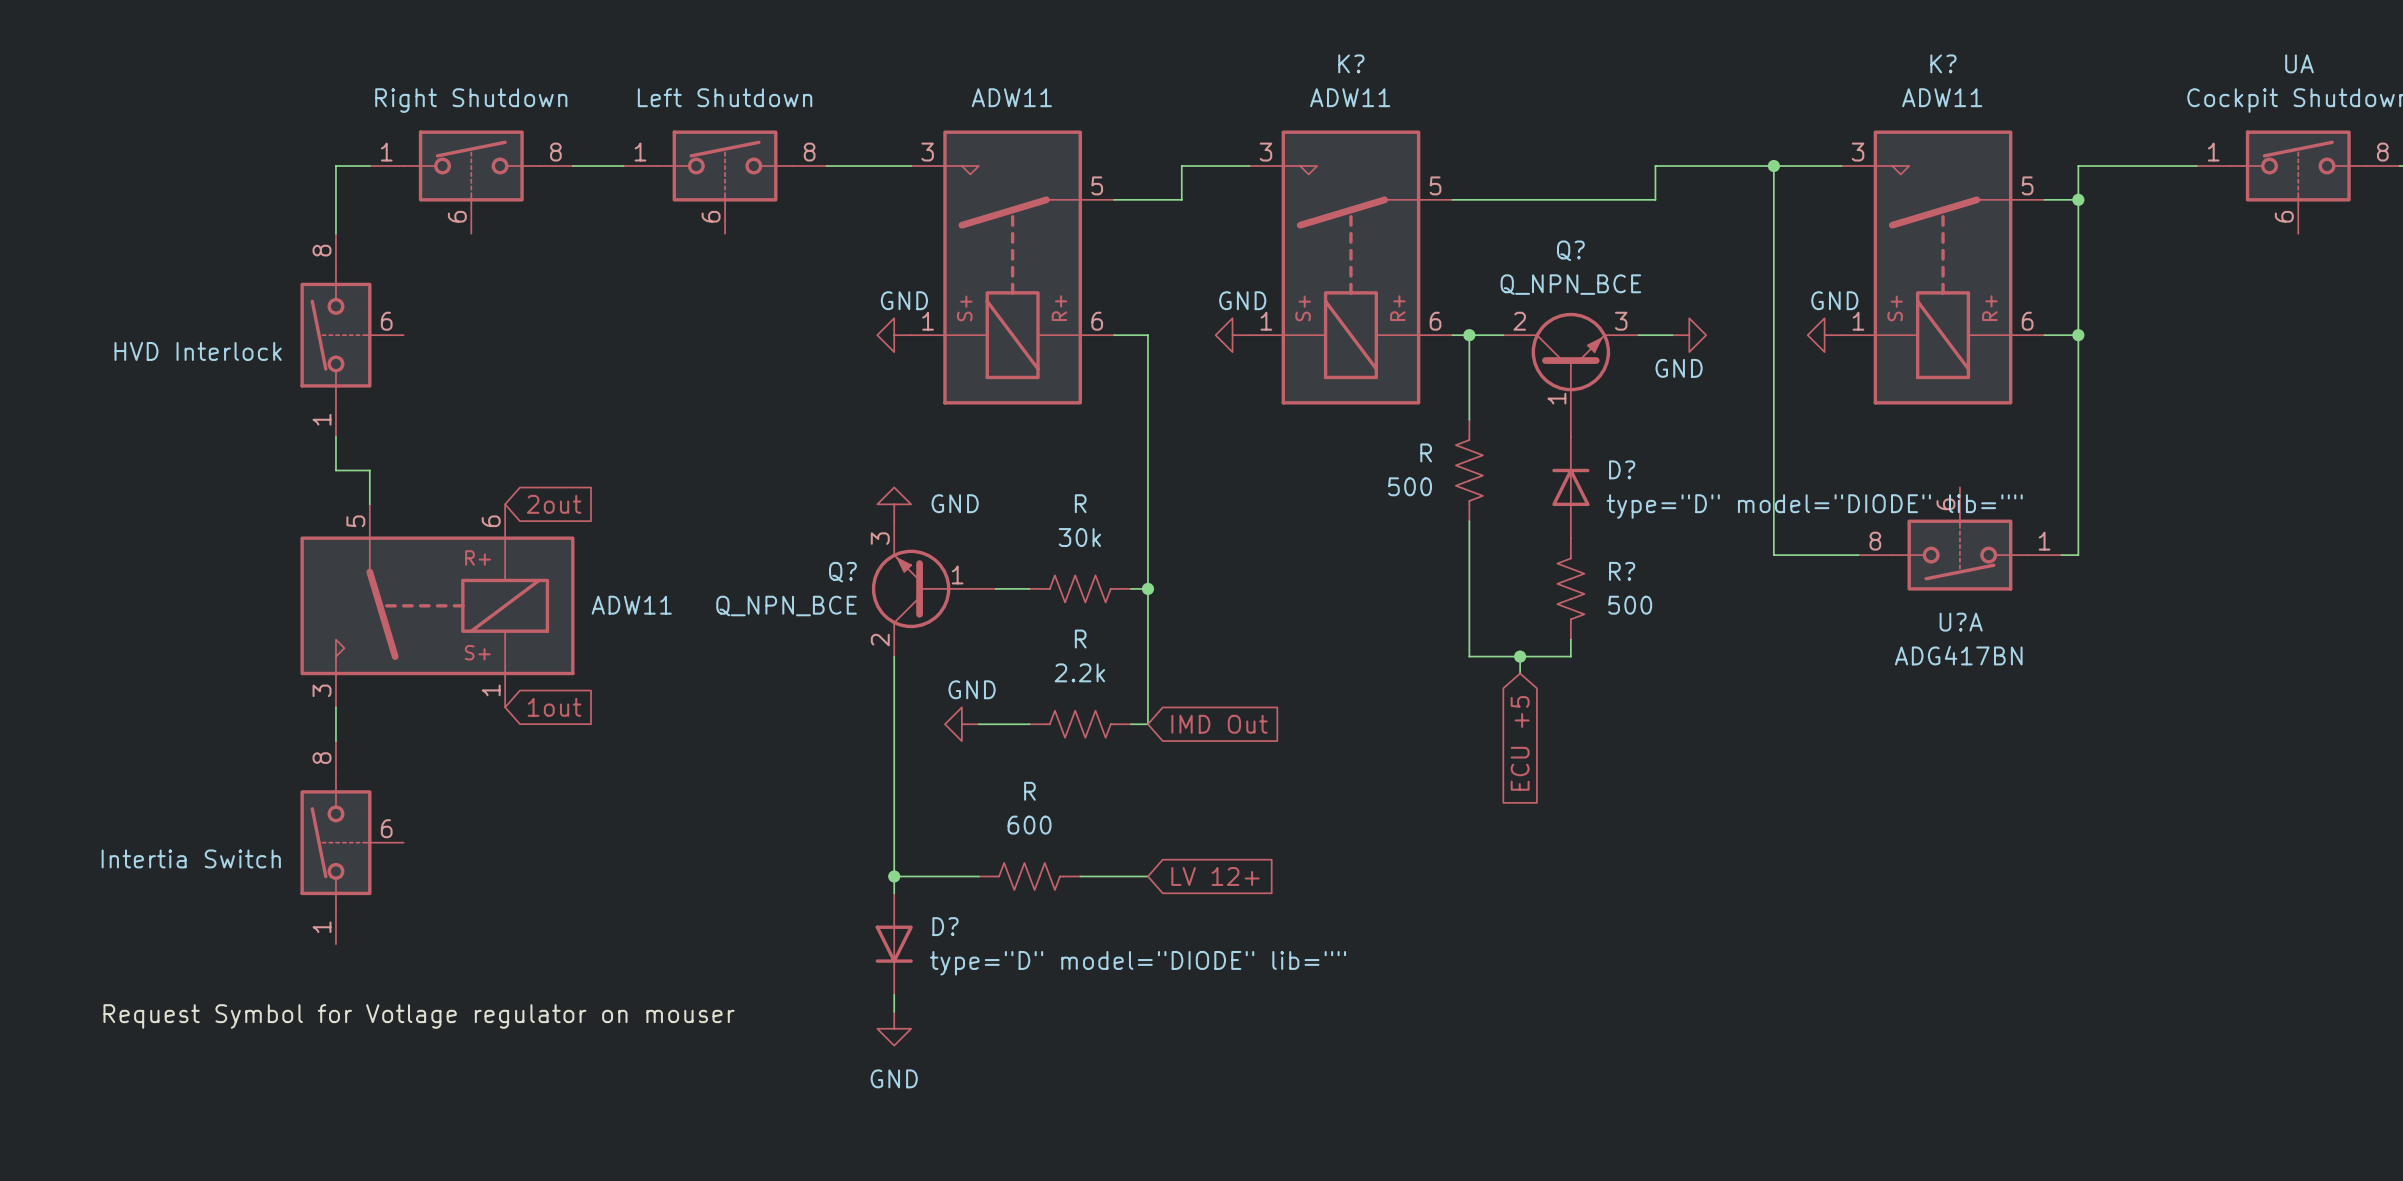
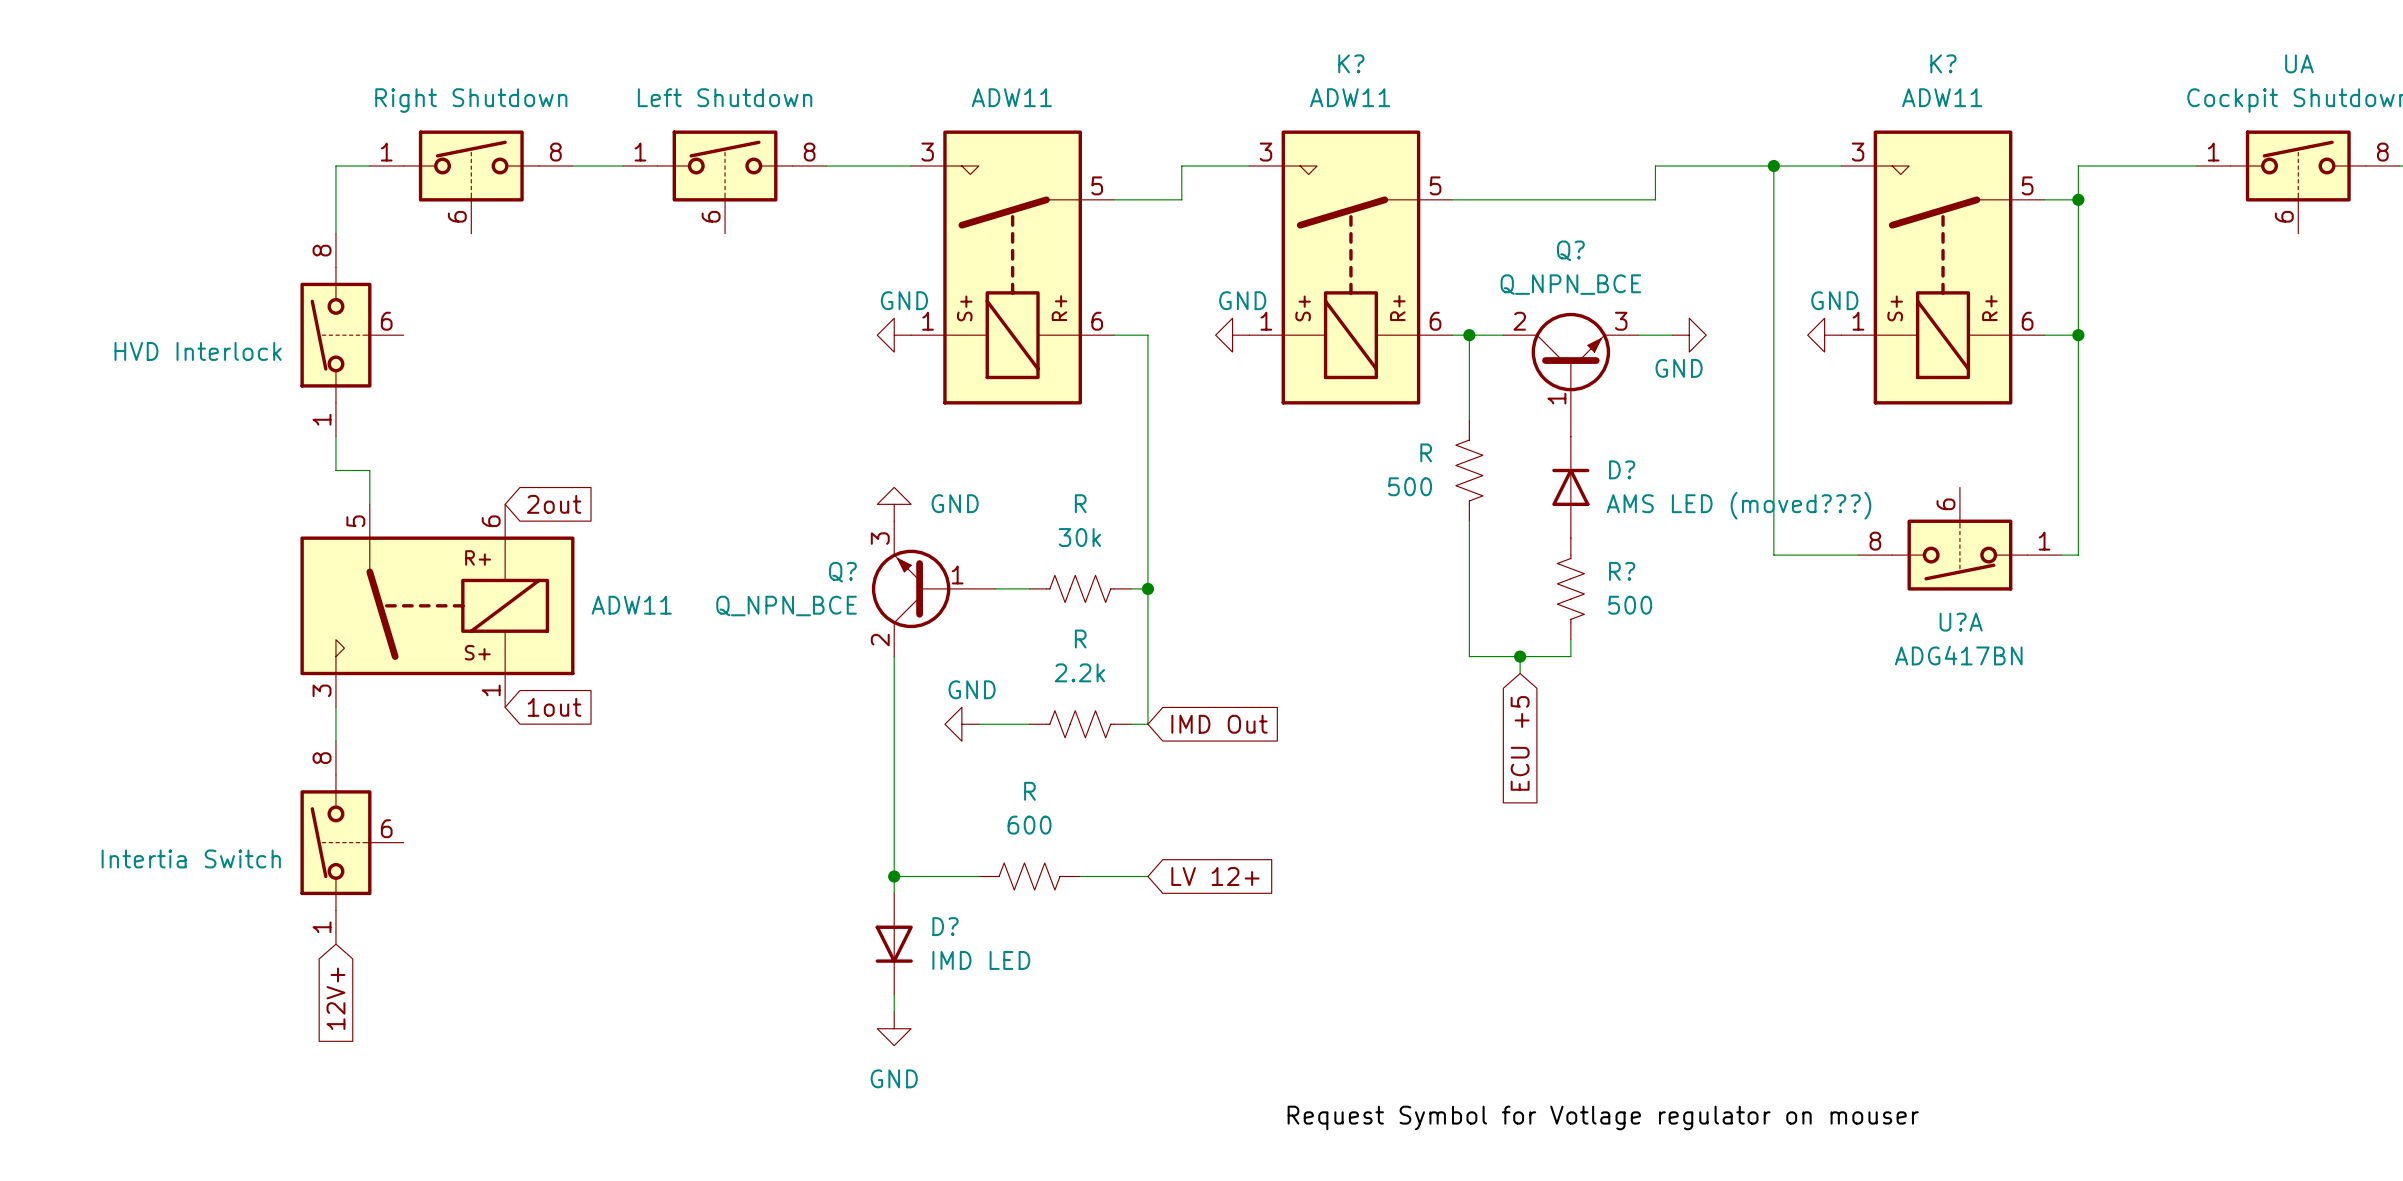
D? value: type="D" model="DIODE" lib="" (1814, 506) -> AMS LED (moved???) (1738, 505)
D? value: type="D" model="DIODE" lib="" (1138, 963) -> IMD LED (981, 960)
global label: none -> 12V+ (335, 998)
label: Request Symbol for Votlage regulator on mouser (419, 1016) -> none
label: none -> Request Symbol for Votlage regulator on mouser (1603, 1117)

